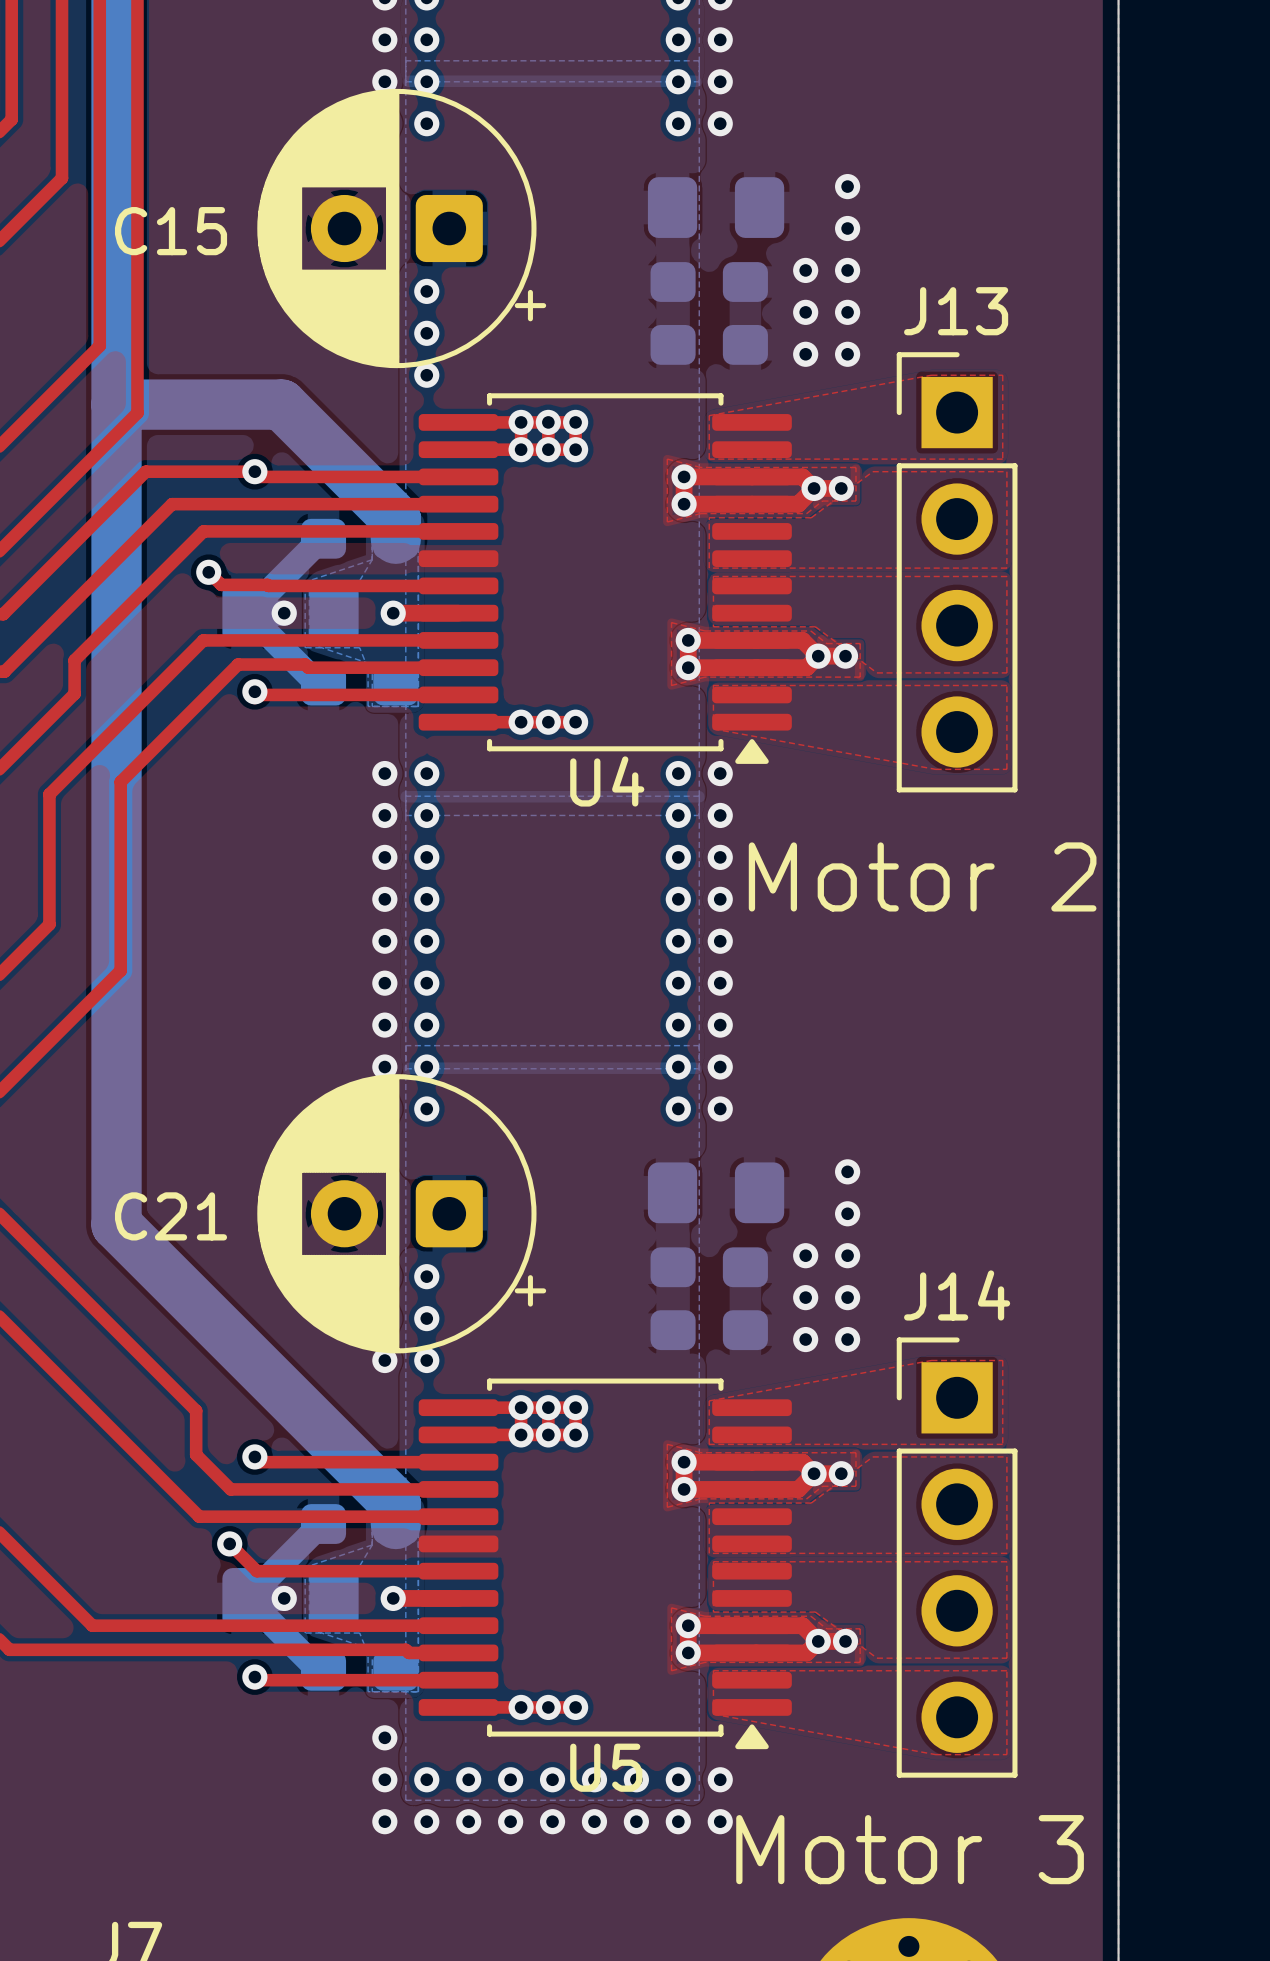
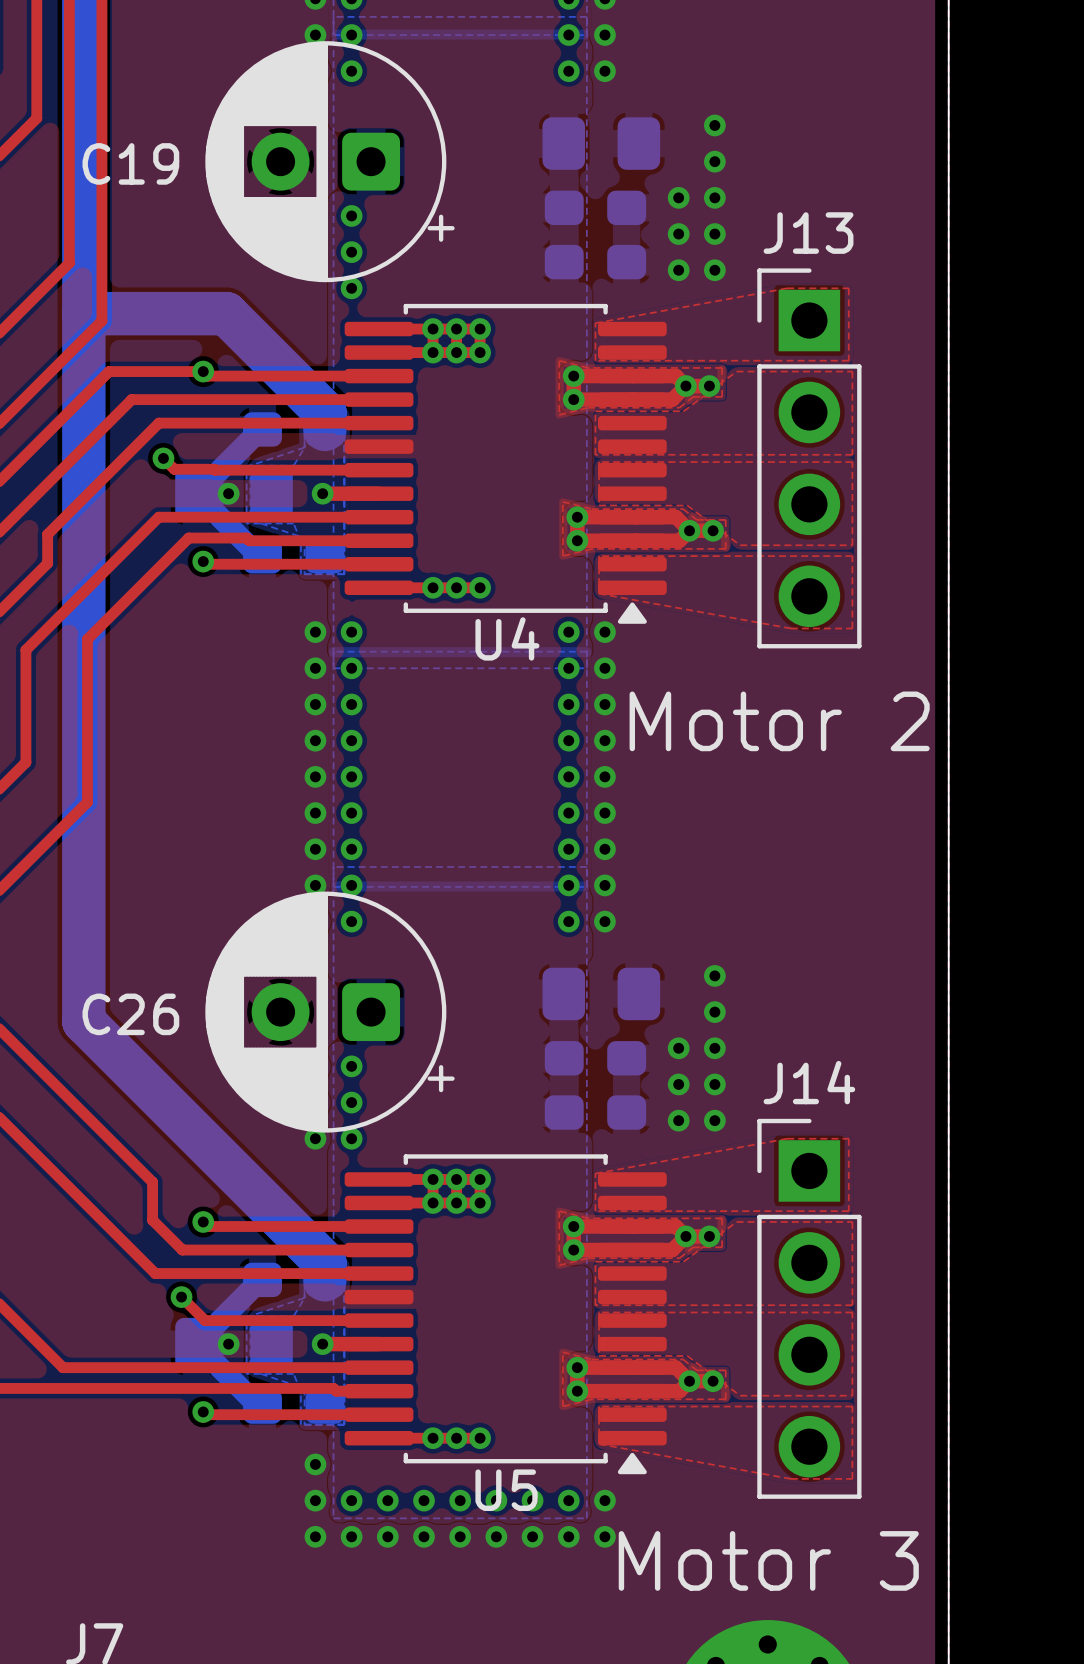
C15 name: C15 (171, 231) -> C19 (130, 163)
C21 name: C21 (171, 1216) -> C26 (130, 1014)

